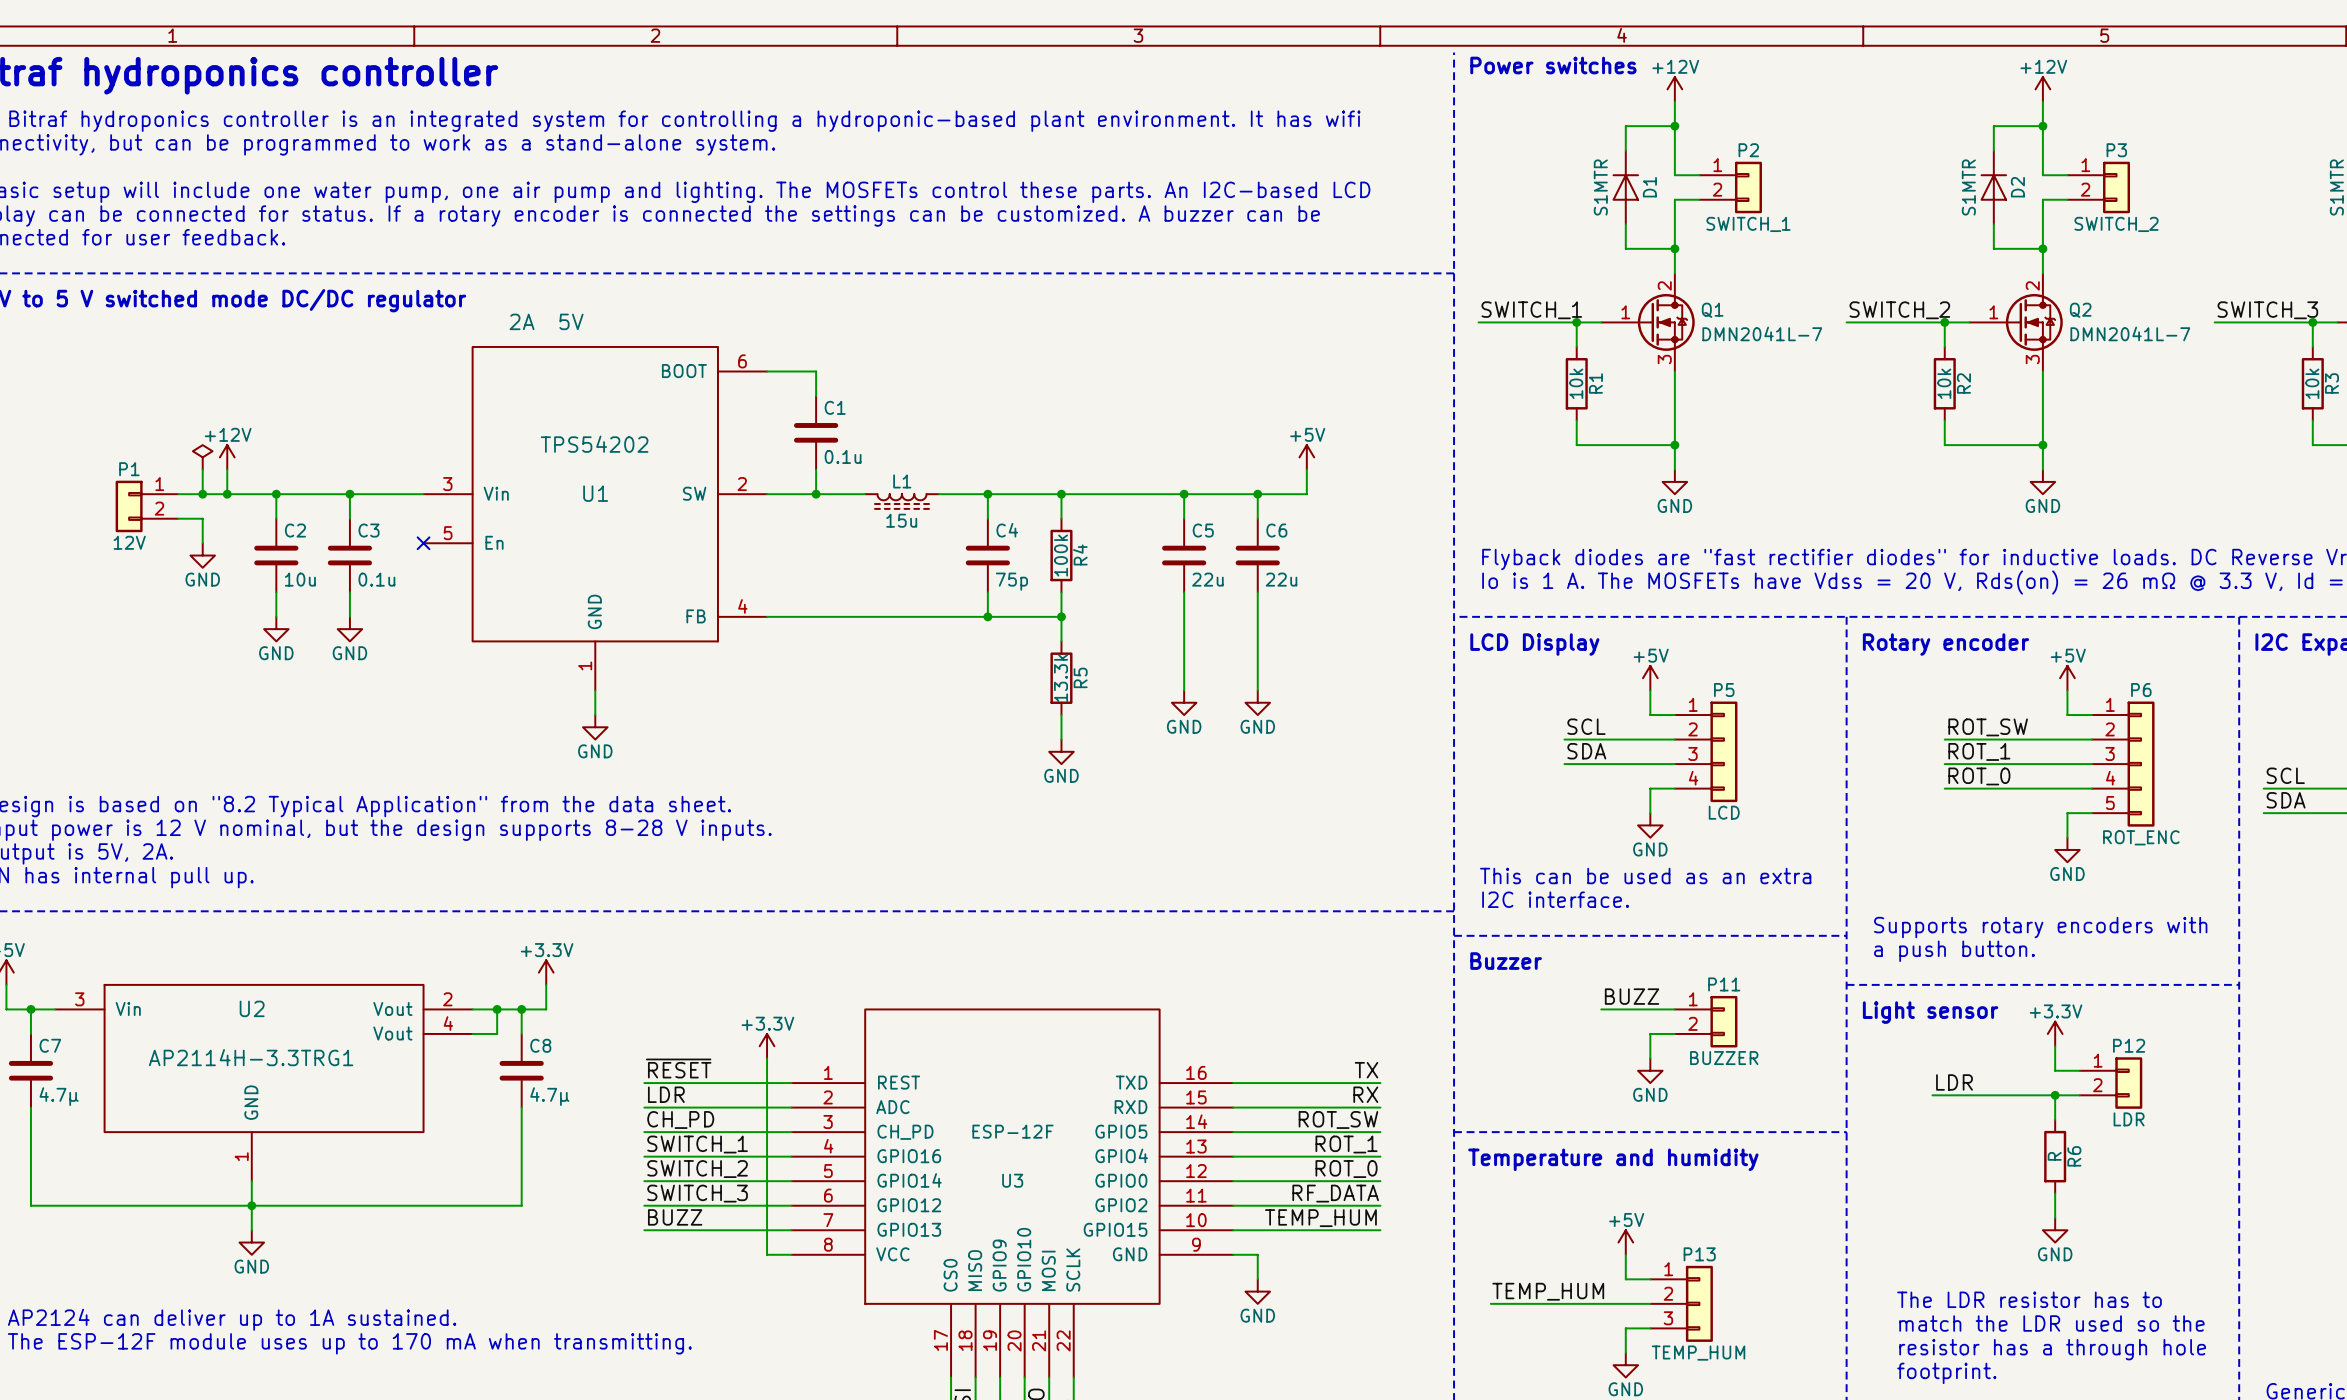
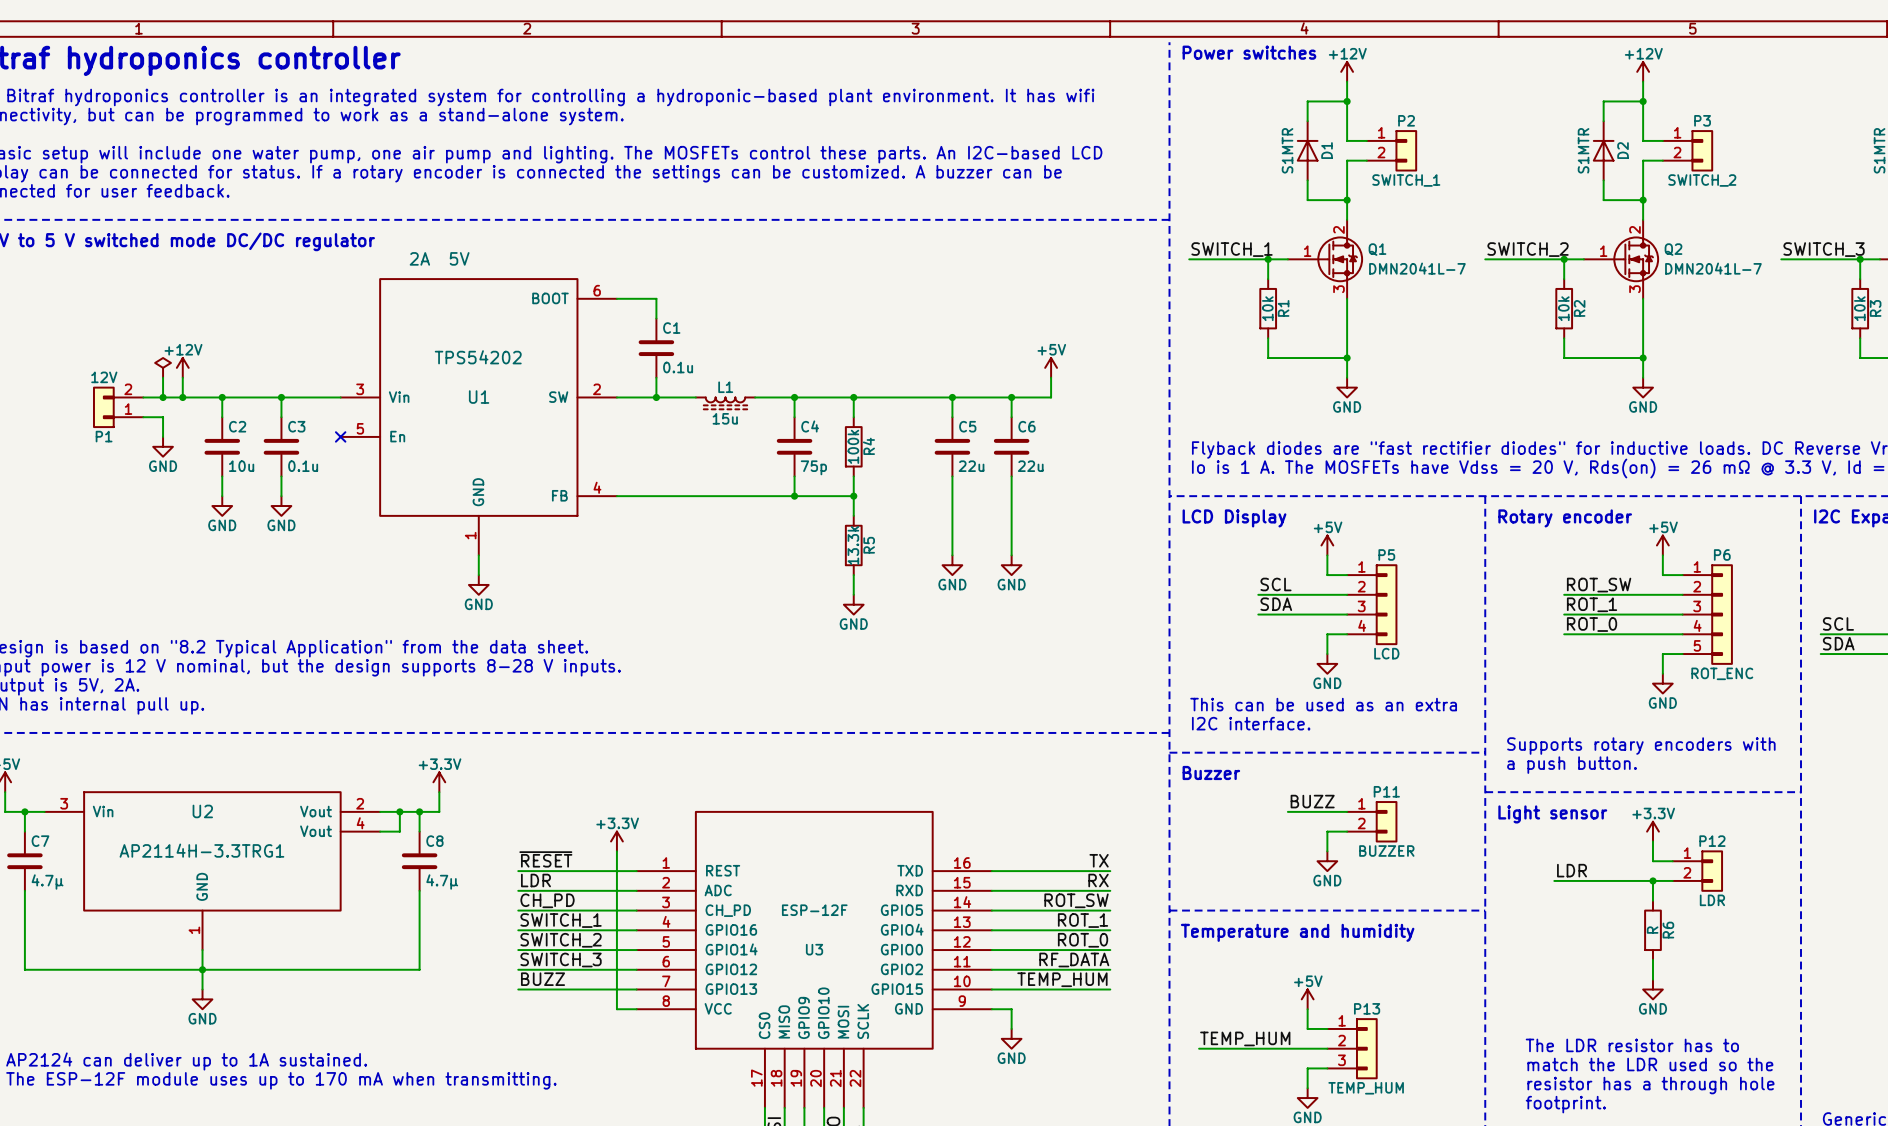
P1 flip: as is (129, 506) -> up-down (103, 407)

